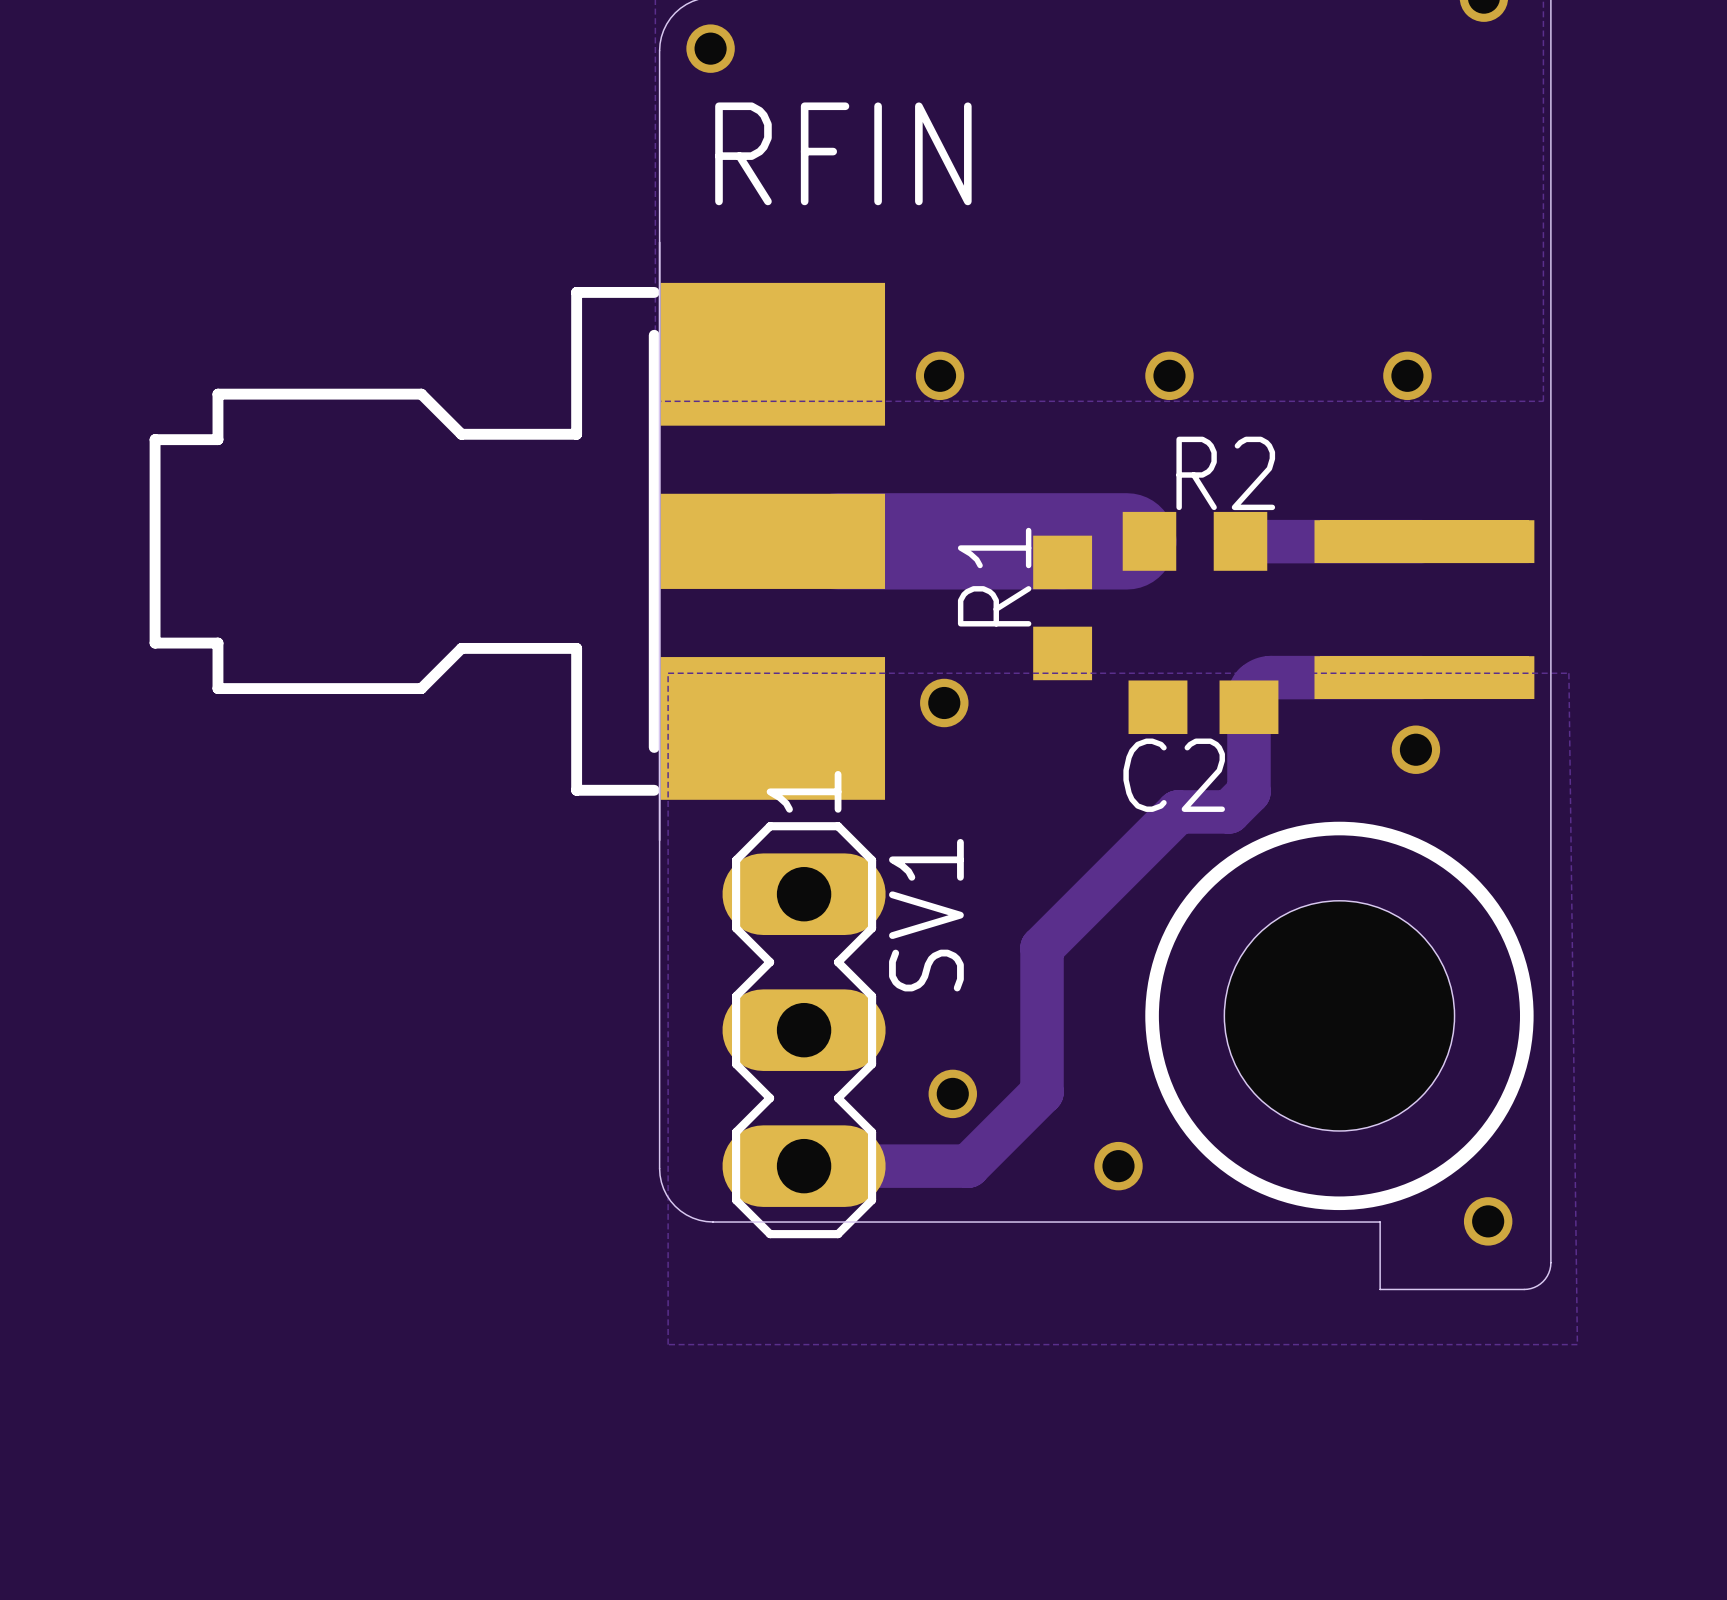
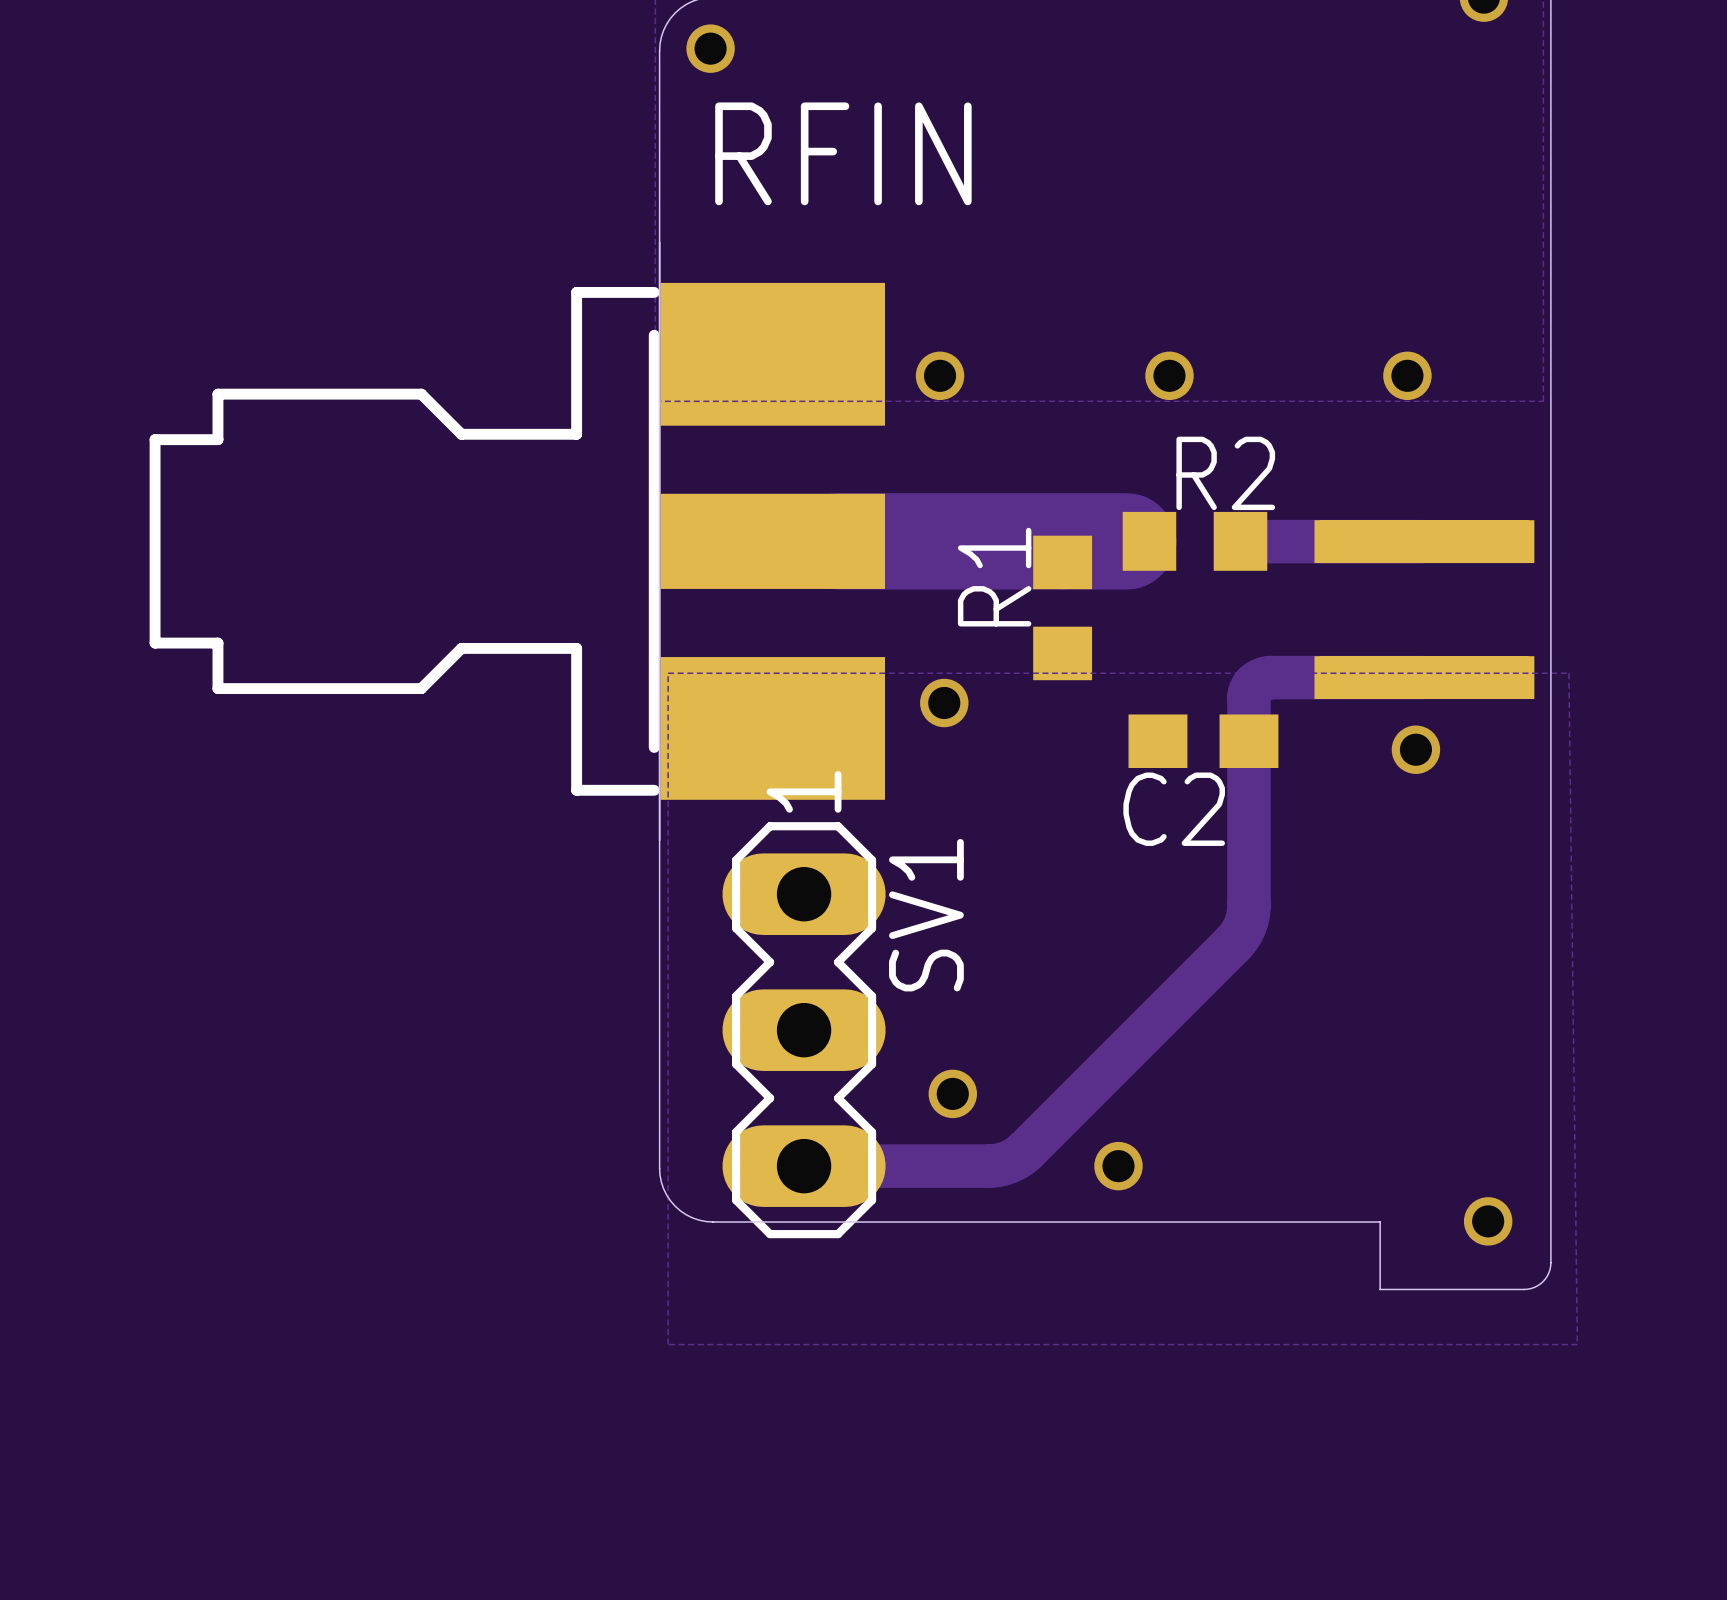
C2 position: (1203, 707) -> (1203, 741)
track: (1248, 791) (1228, 811) (1177, 811) (1042, 947) (1042, 1092) (968, 1166) -> (1248, 791) (1248, 912) (1244, 926) (1237, 938) (1021, 1155) (1002, 1164) (968, 1166)
drawing: [1145, 821, 1534, 1211] -> none
hole: (1339, 1015) -> none

